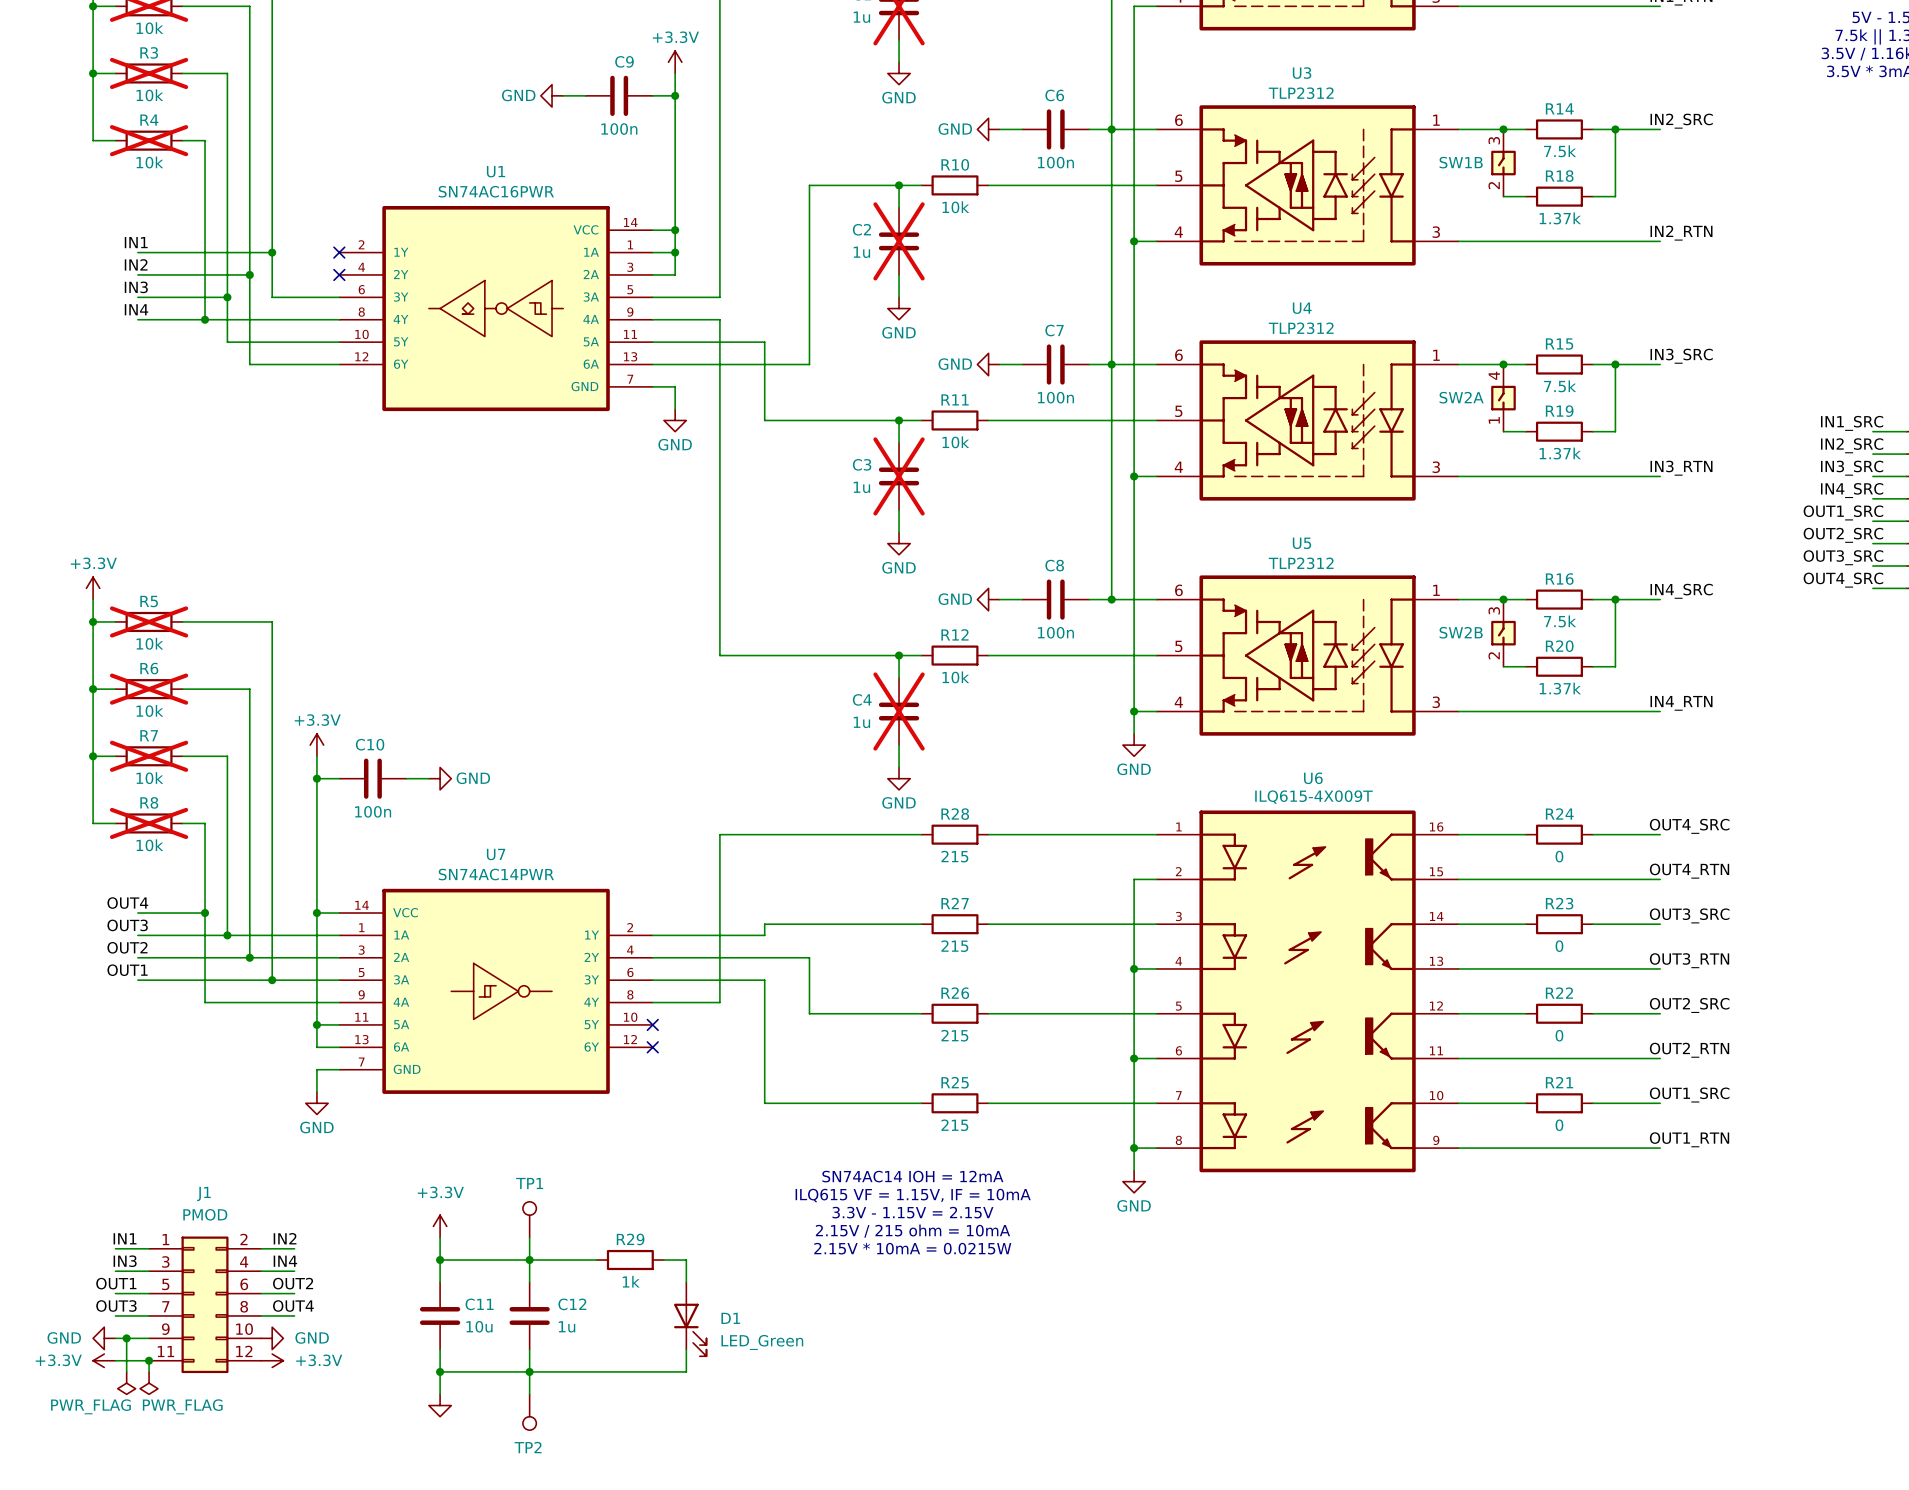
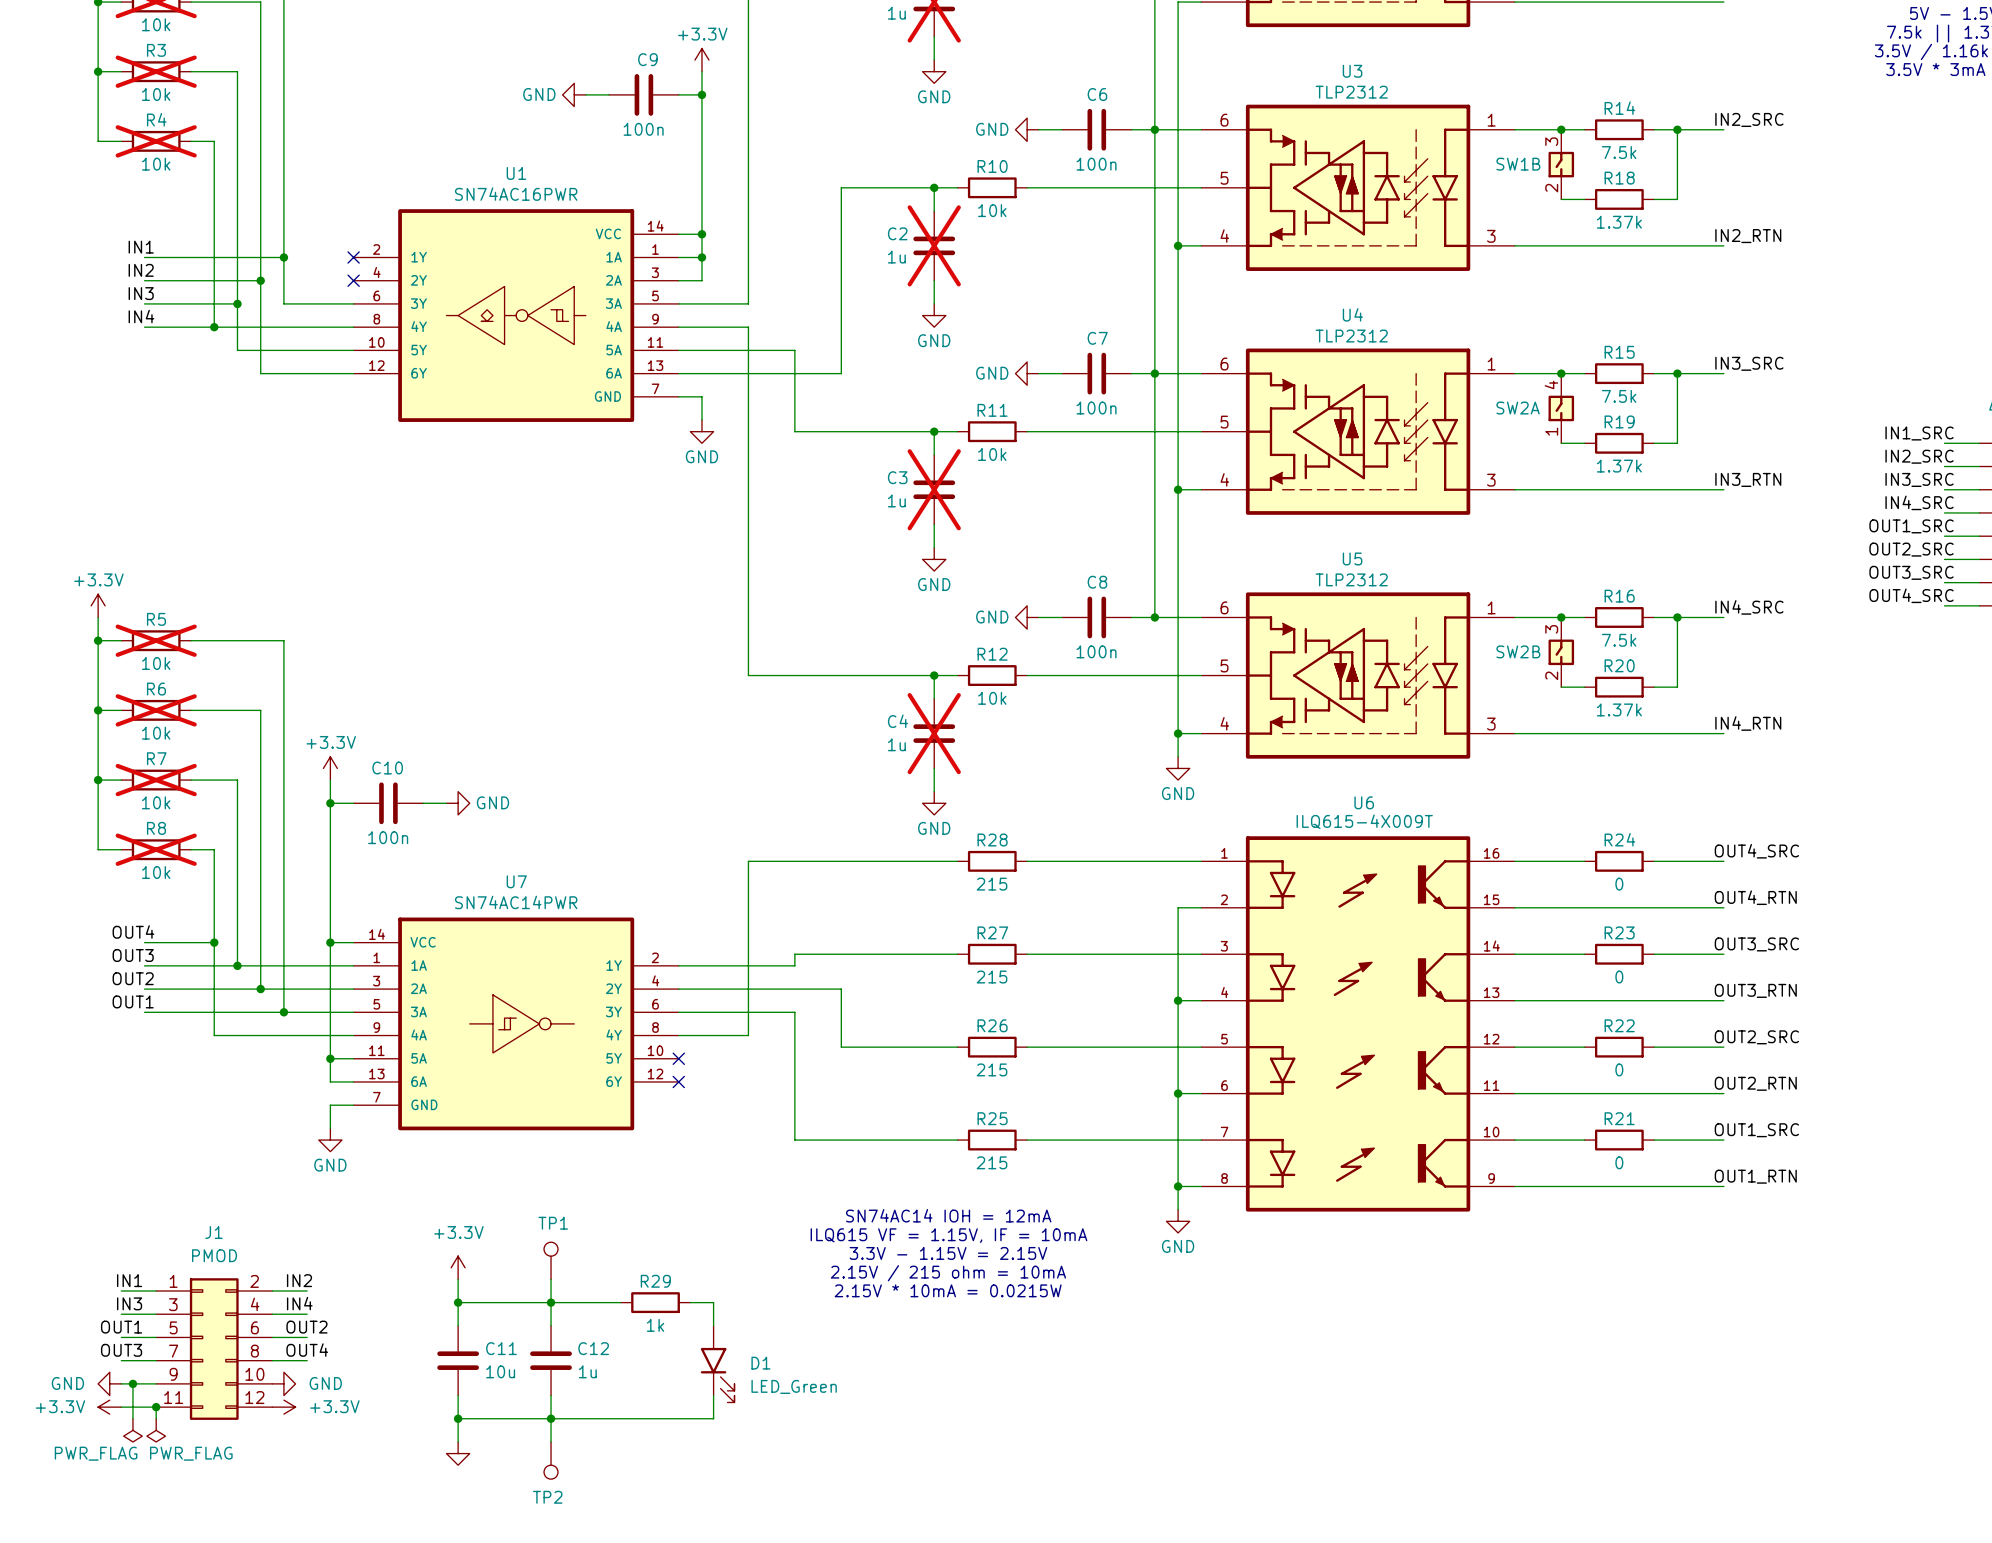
D1 symbol: [674, 1282, 707, 1357] -> [700, 1325, 735, 1403]

